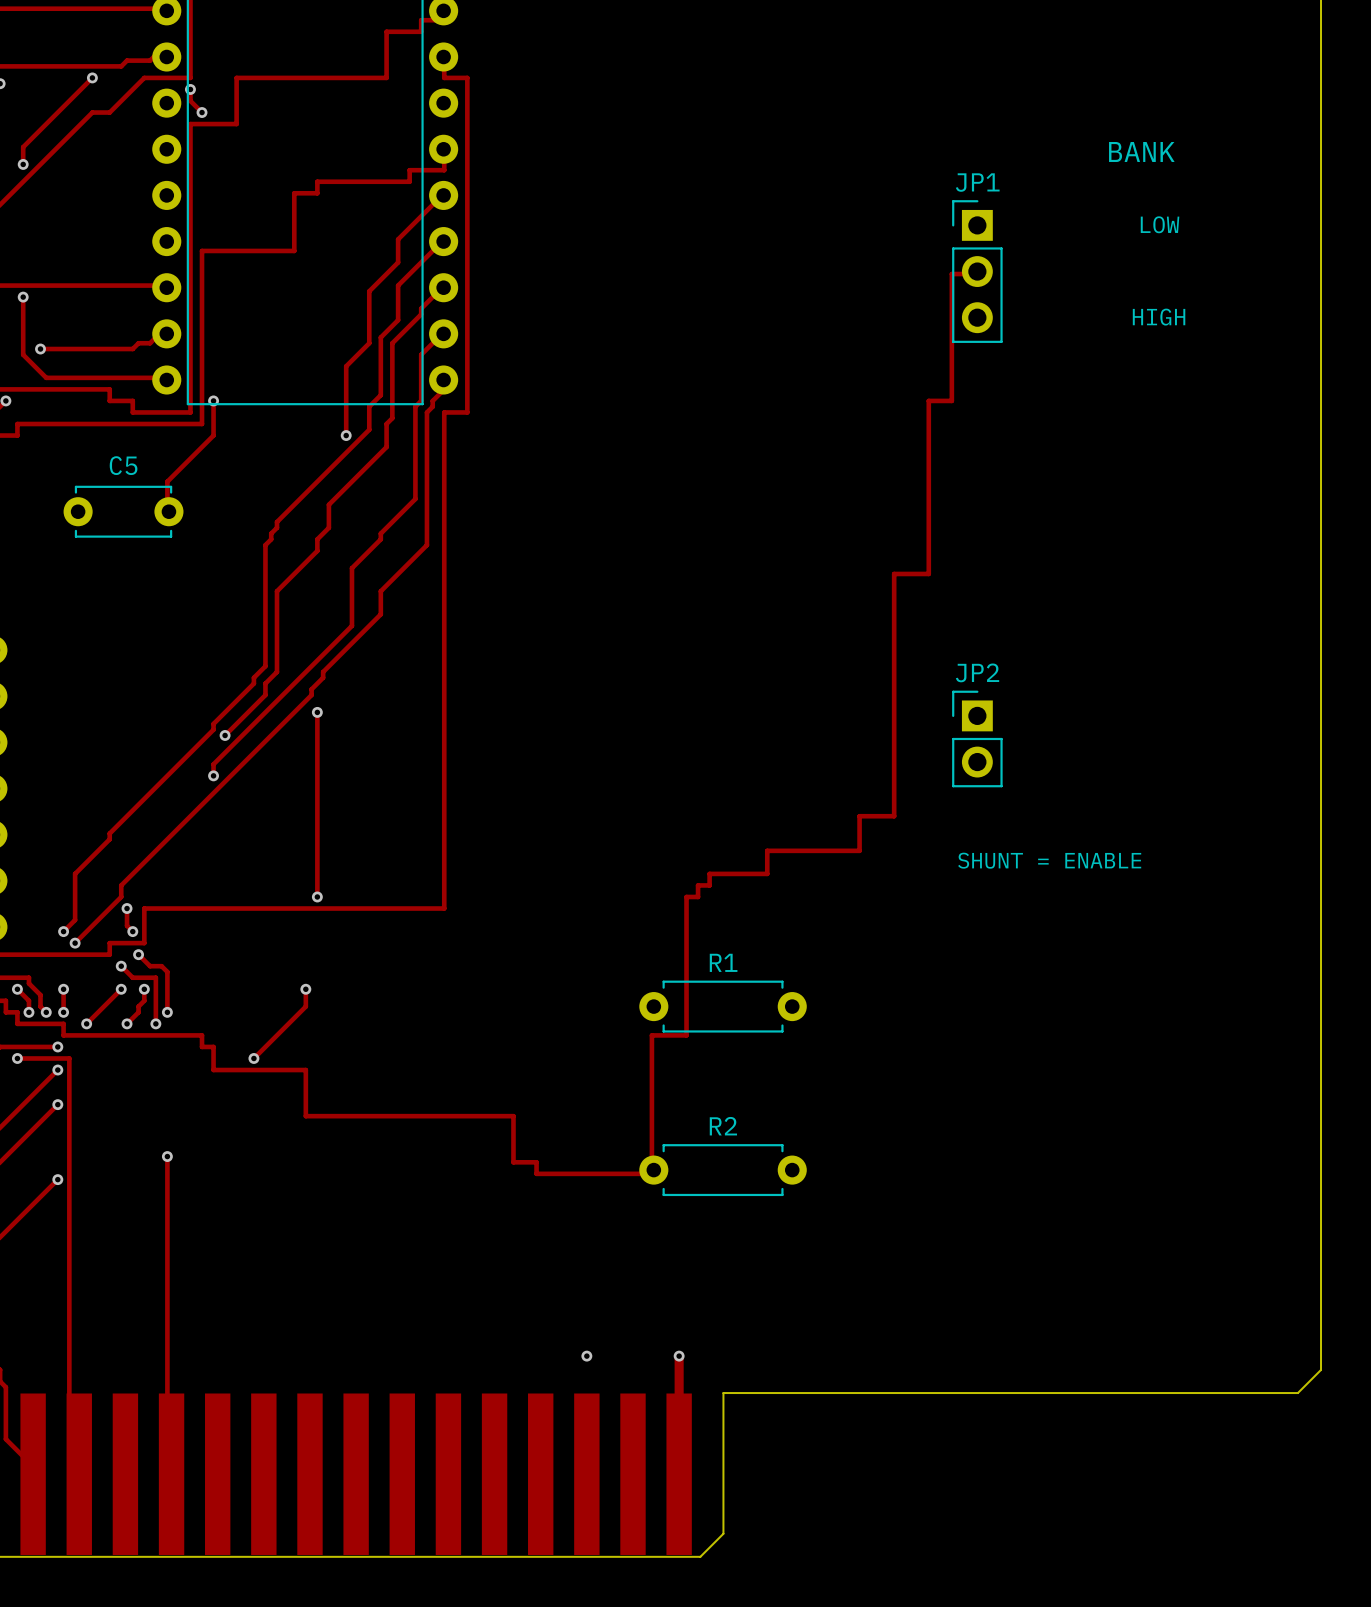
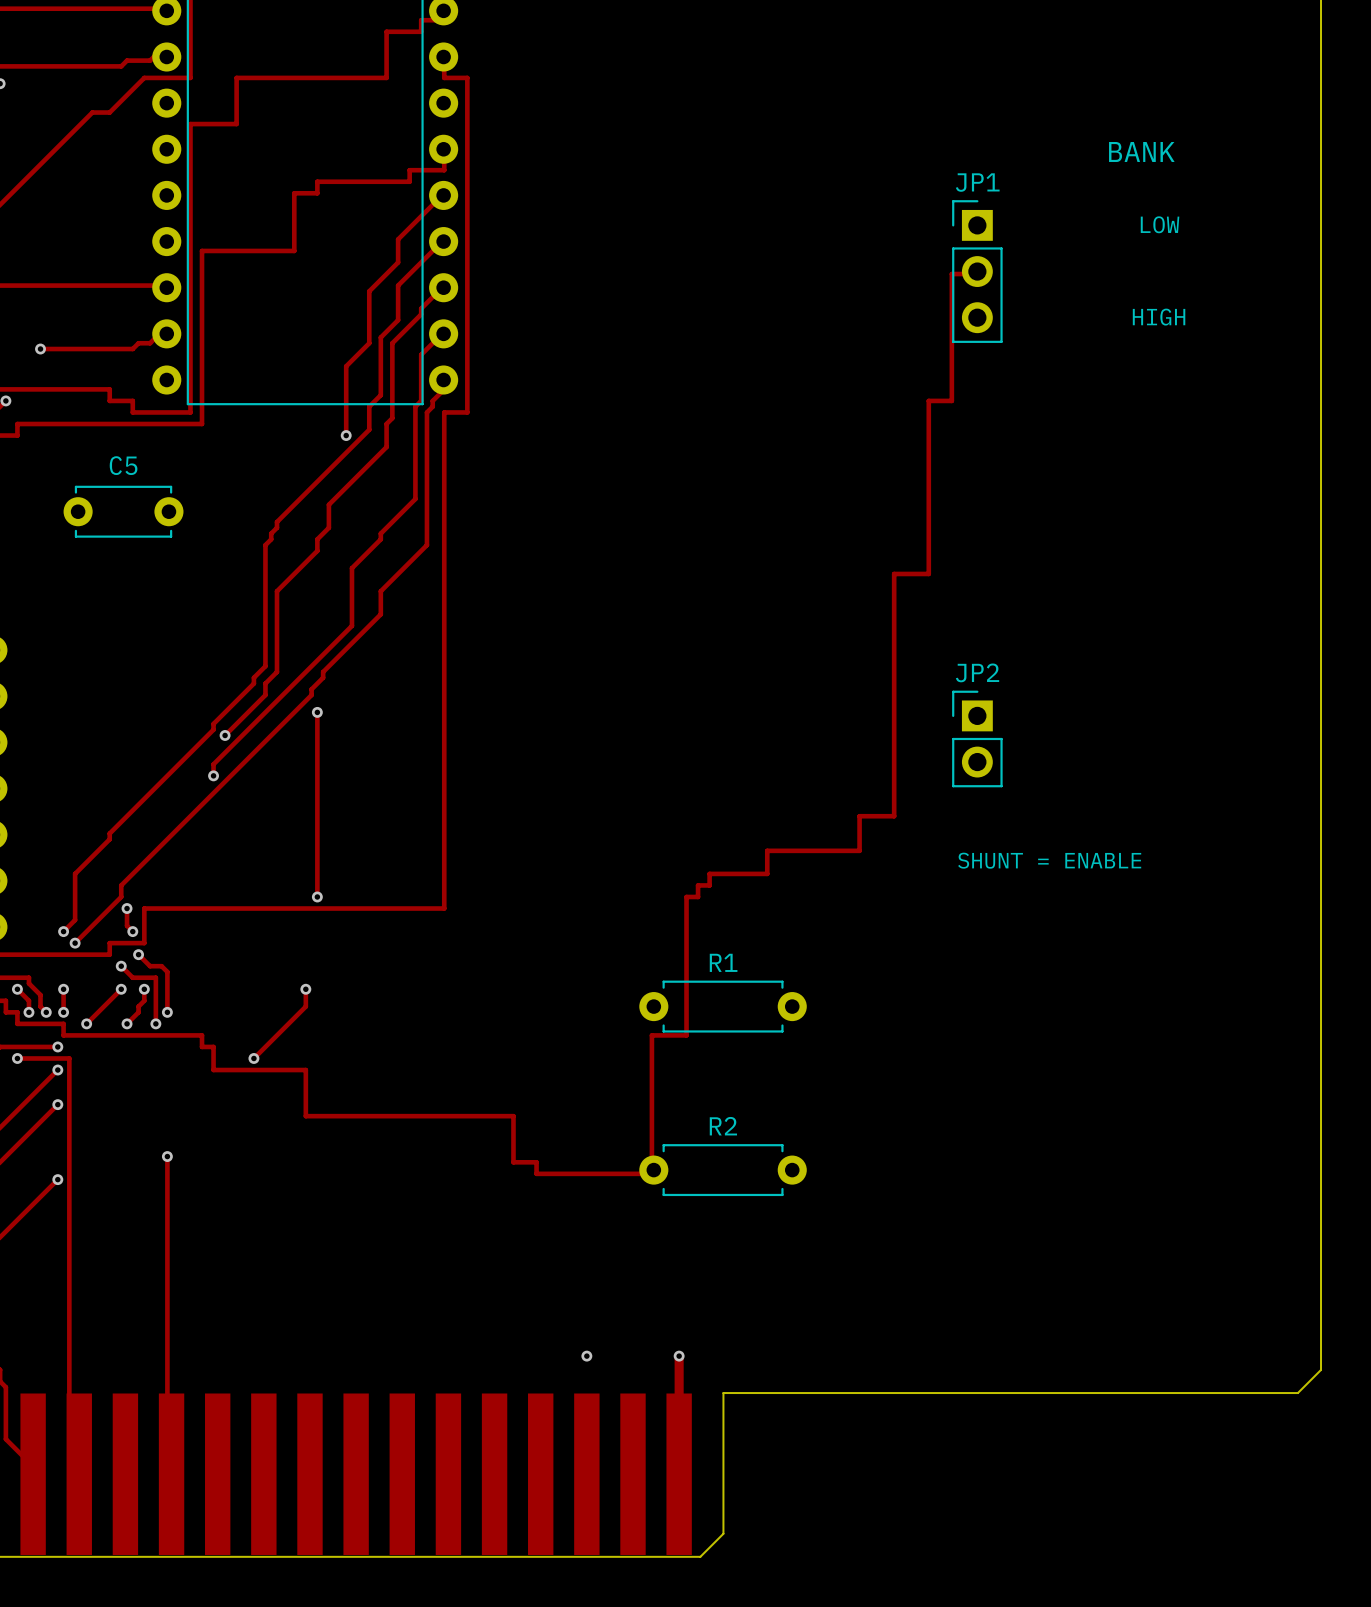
track: (92, 77) (23, 147) (23, 164) -> none
via: (92, 77) -> none
track: (190, 89) (190, 100) (202, 112) -> none
via: (190, 89) -> none
via: (202, 112) -> none
via: (23, 164) -> none
track: (23, 297) (23, 354) (46, 377) (167, 377) (166, 380) -> none
via: (23, 297) -> none
track: (213, 400) (213, 435) (167, 481) (168, 511) -> none
via: (213, 400) -> none

